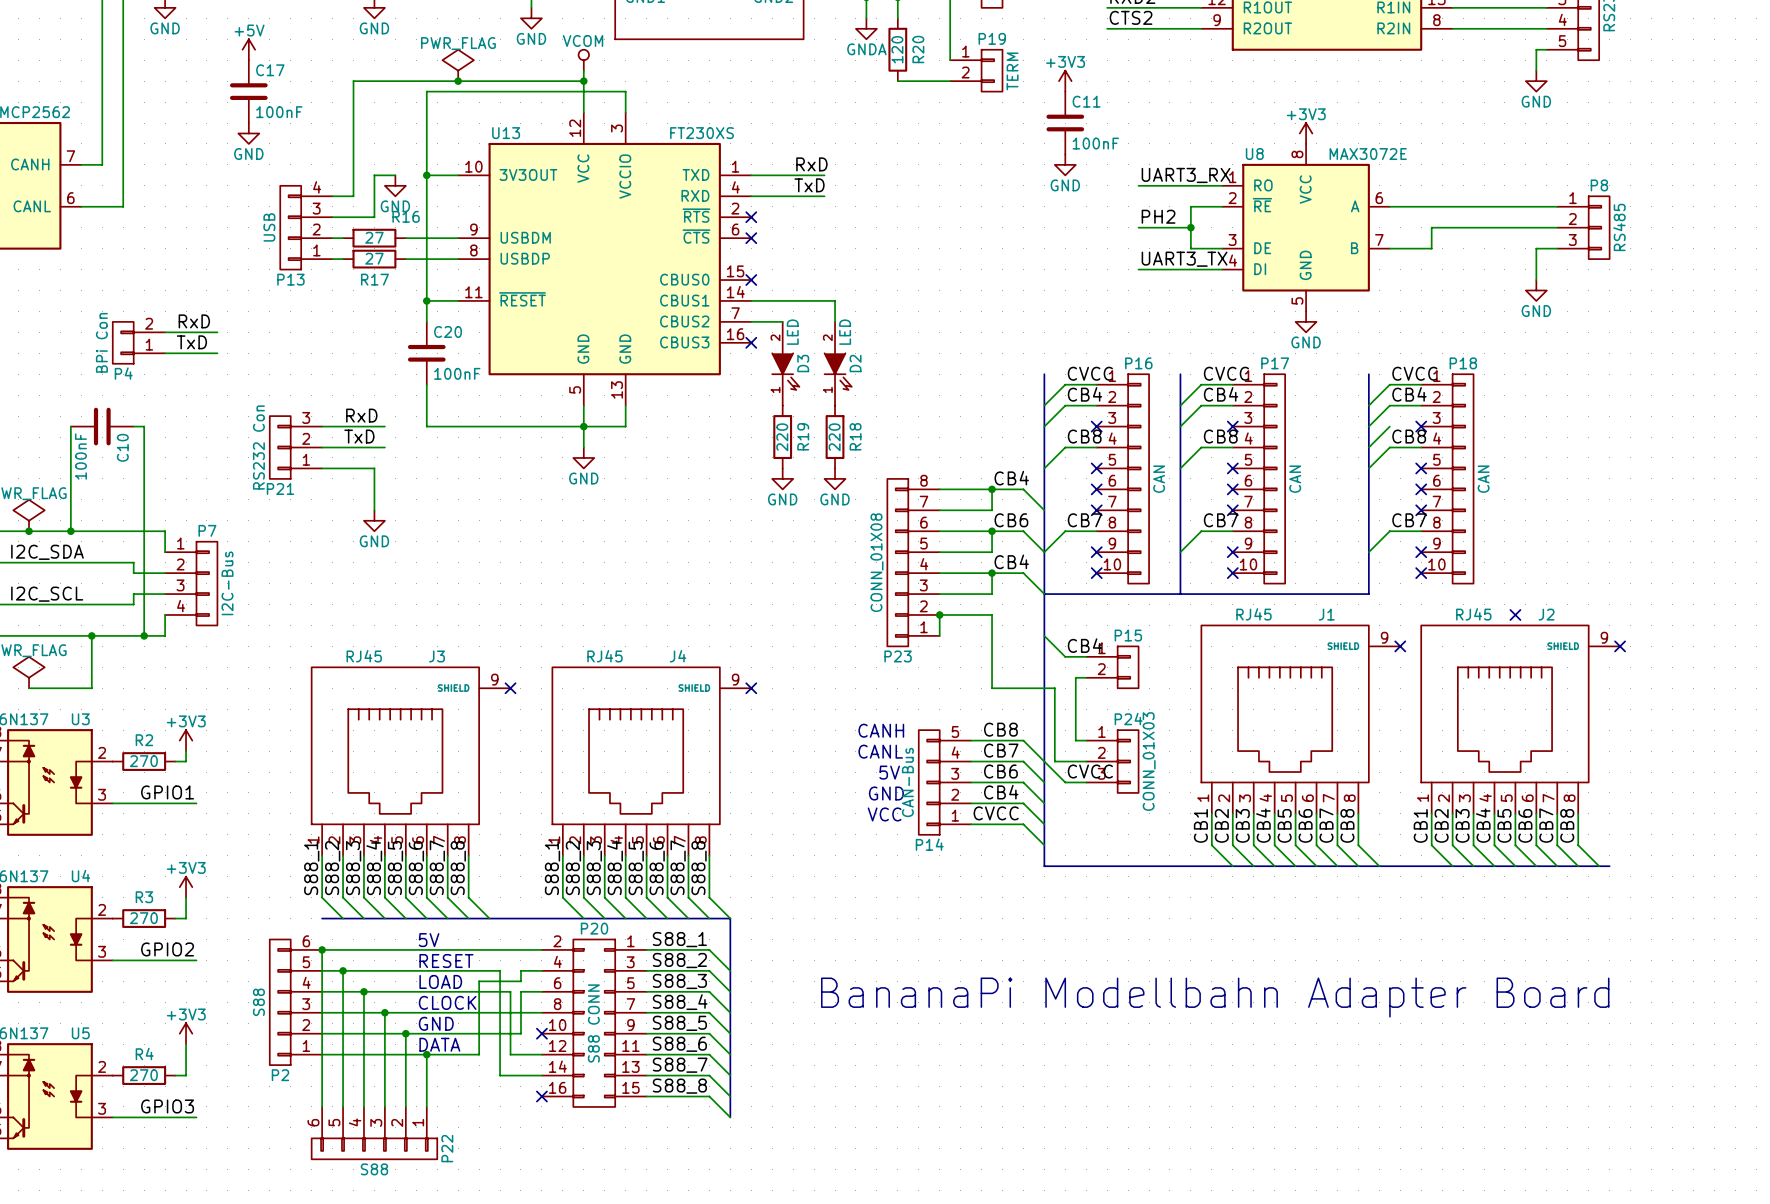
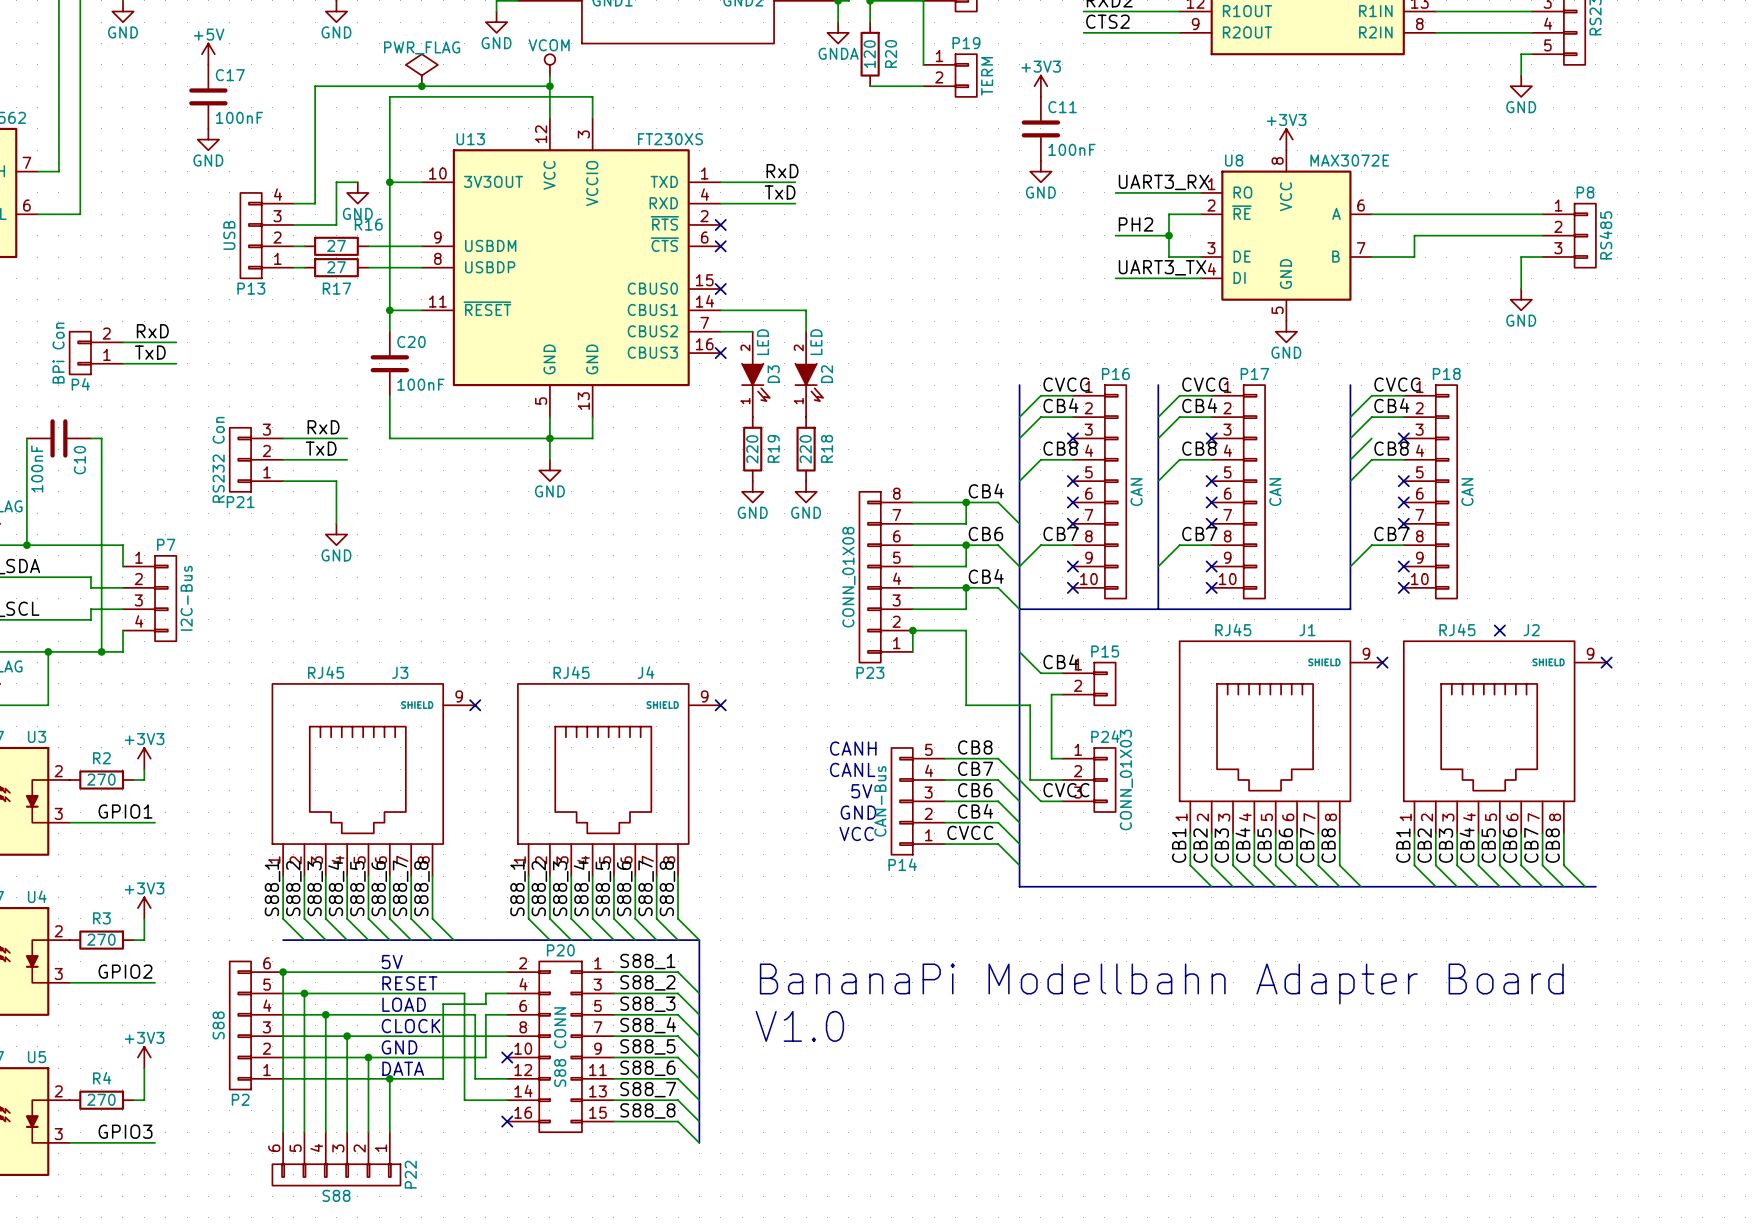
text position: BananaPi Modellbahn Adapter Board (1215, 997) -> BananaPi Modellbahn Adapter Board (1161, 983)
text: none -> V1.0 (799, 1026)

